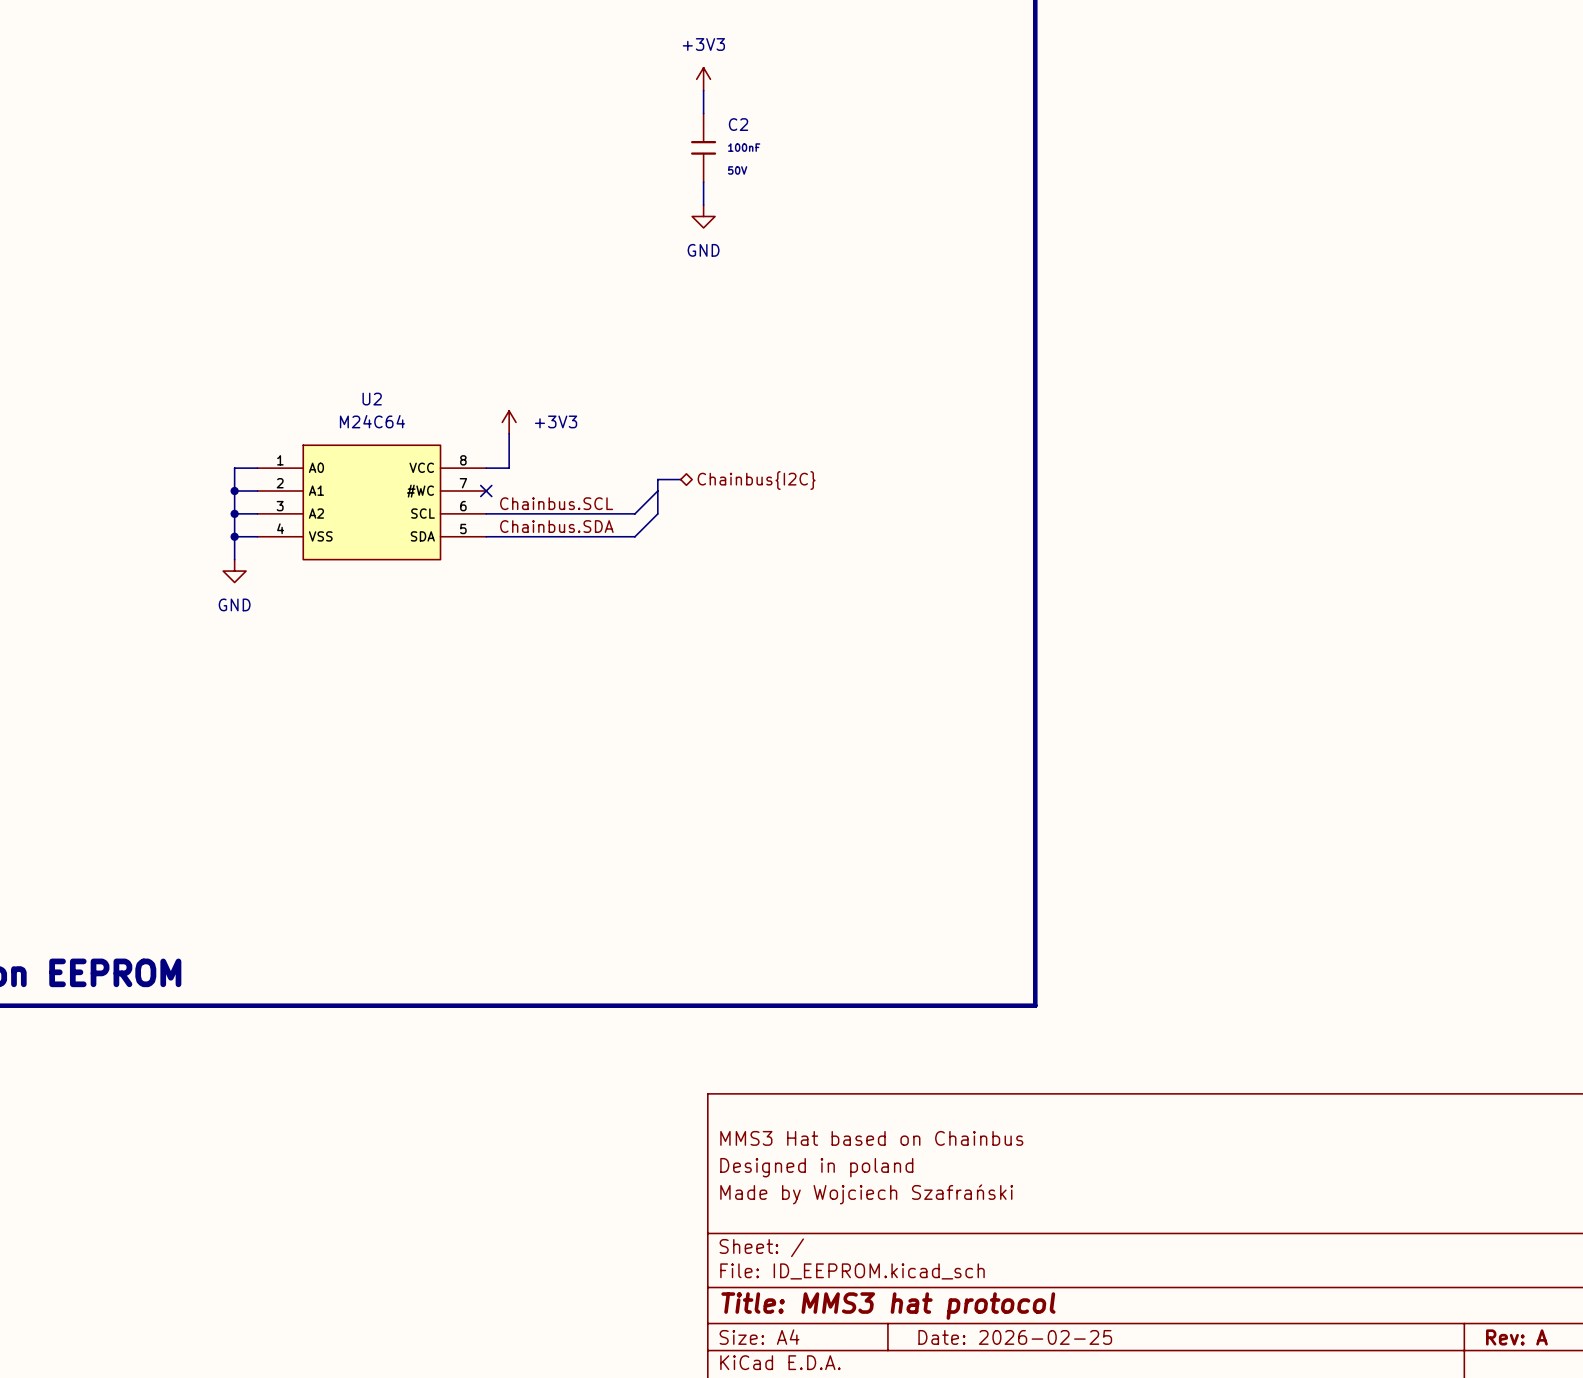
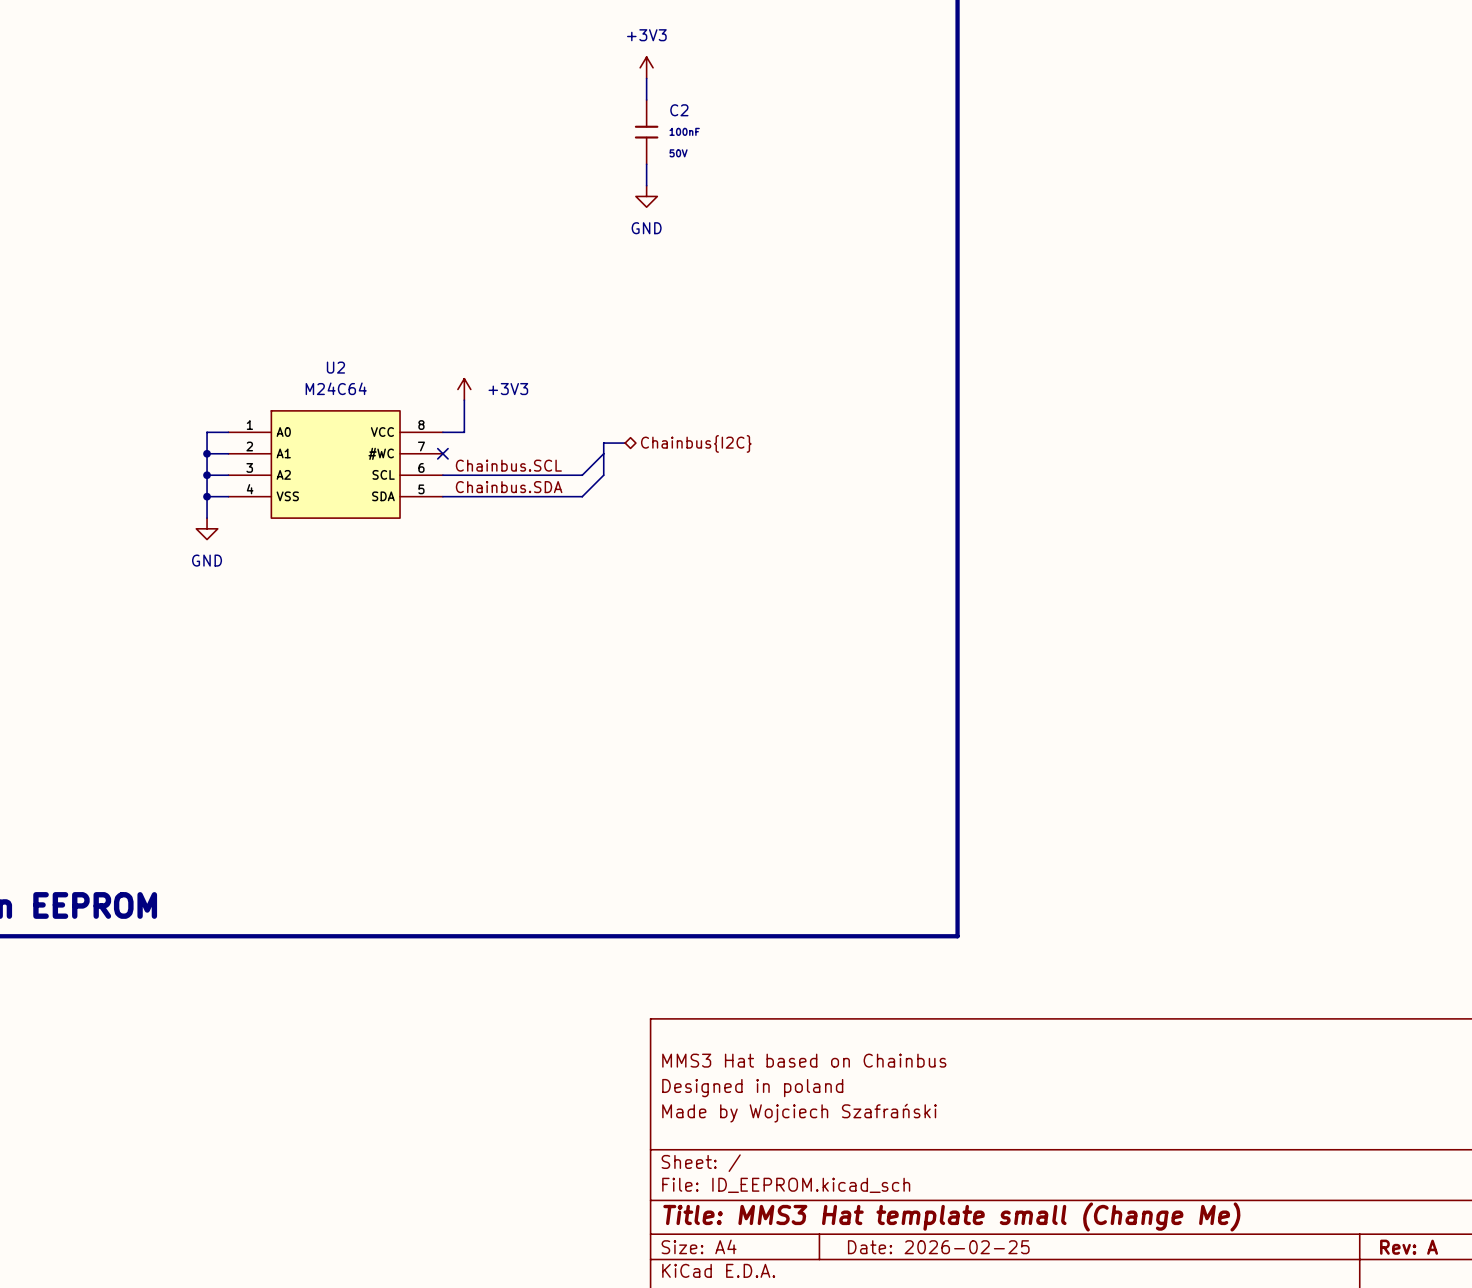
title block: Title: MMS3 hat protocol (888, 1306) -> Title: MMS3 Hat template small (Change Me) (951, 1216)

